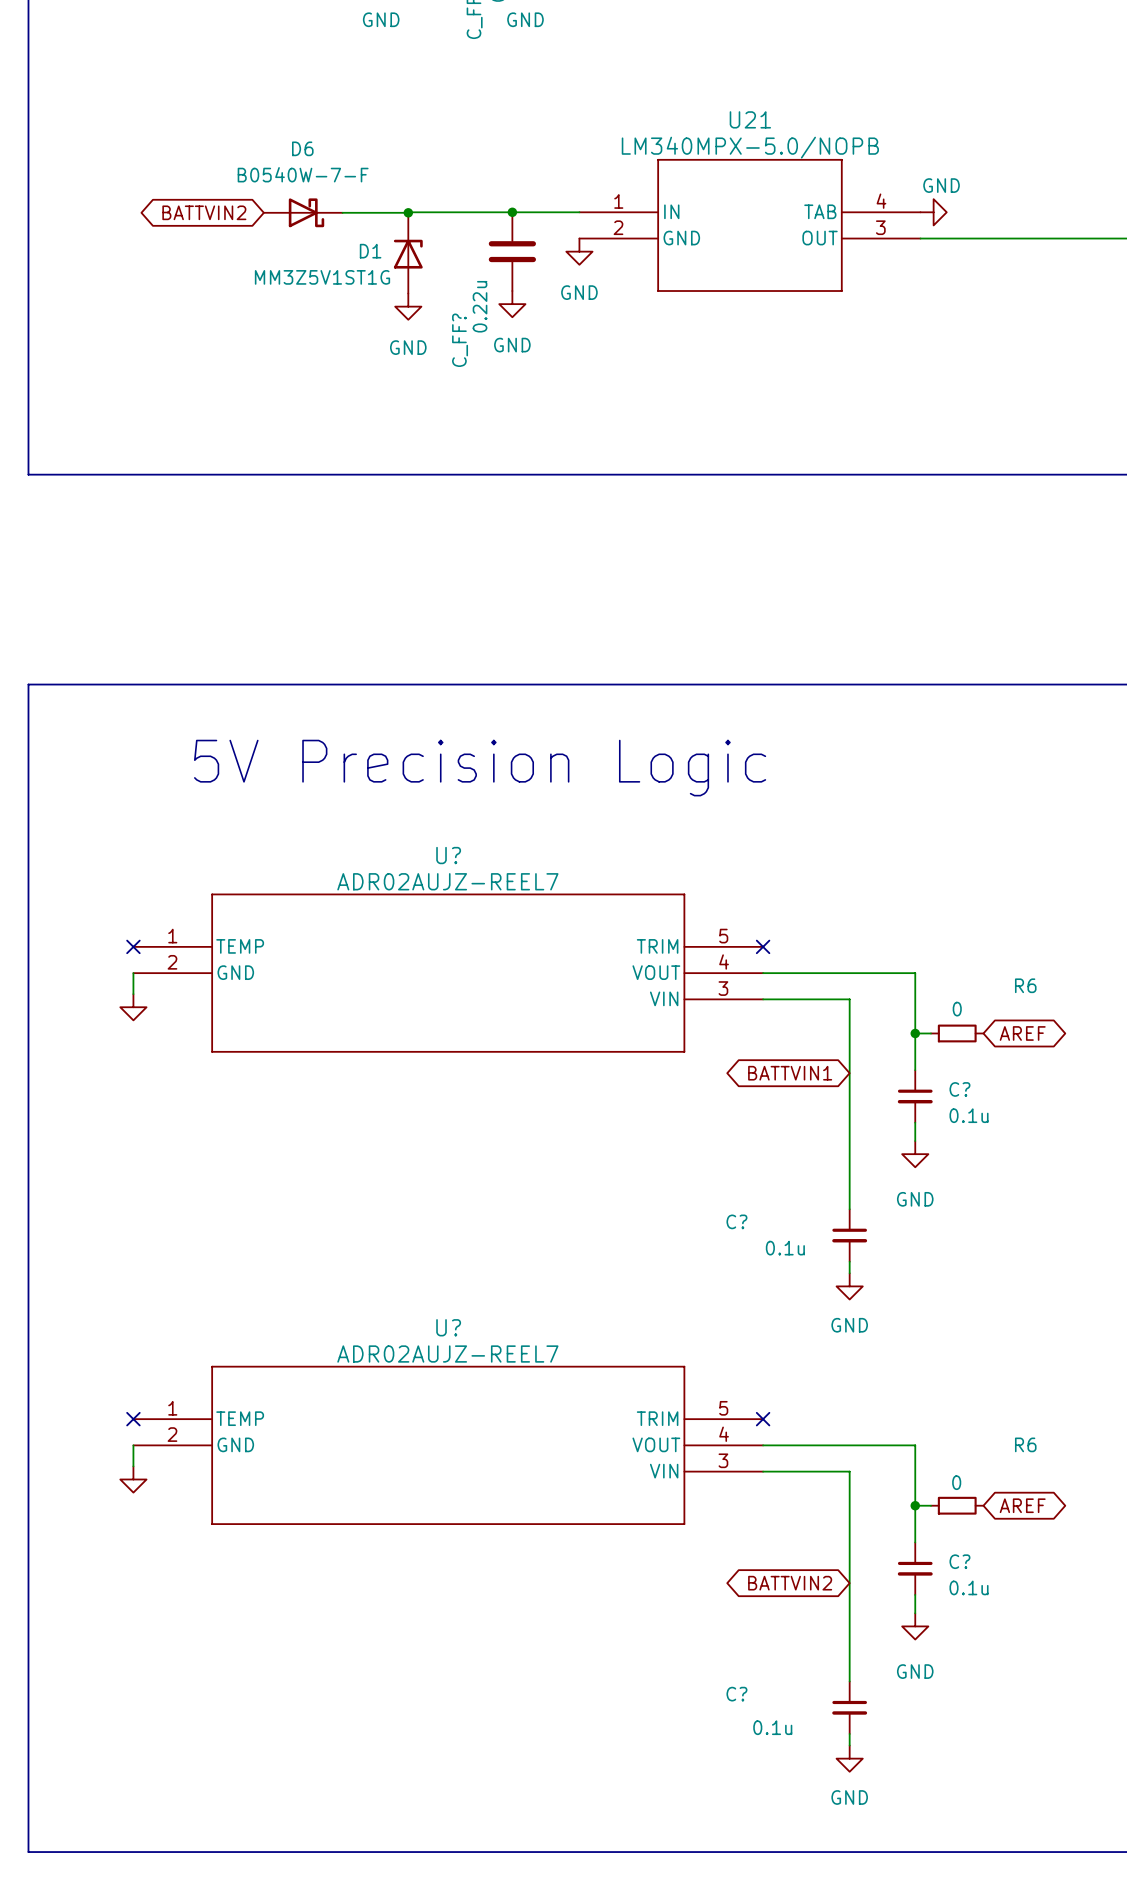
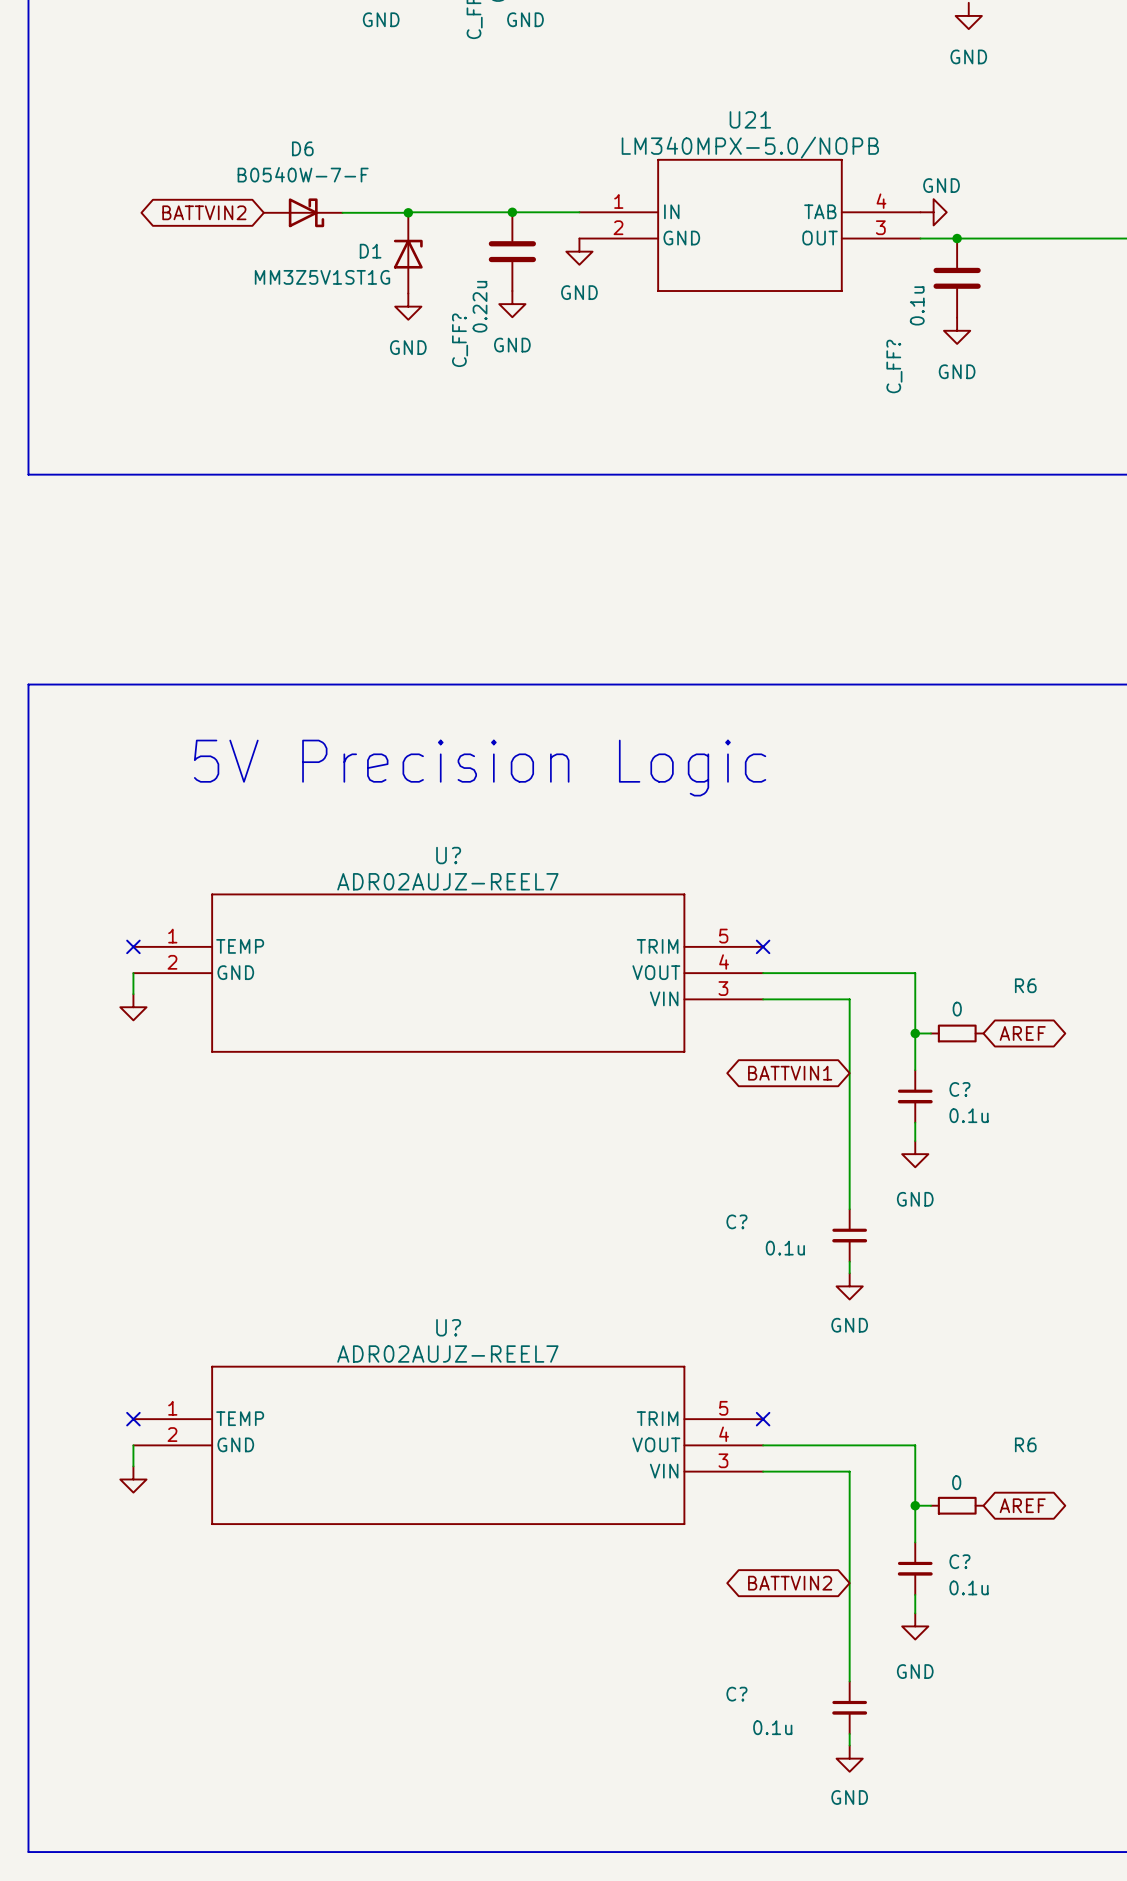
power symbol: none -> GND (968, 15)
junction: none -> (957, 238)
C_FF?: none -> 0.1u (957, 278)
power symbol: none -> GND (957, 330)

